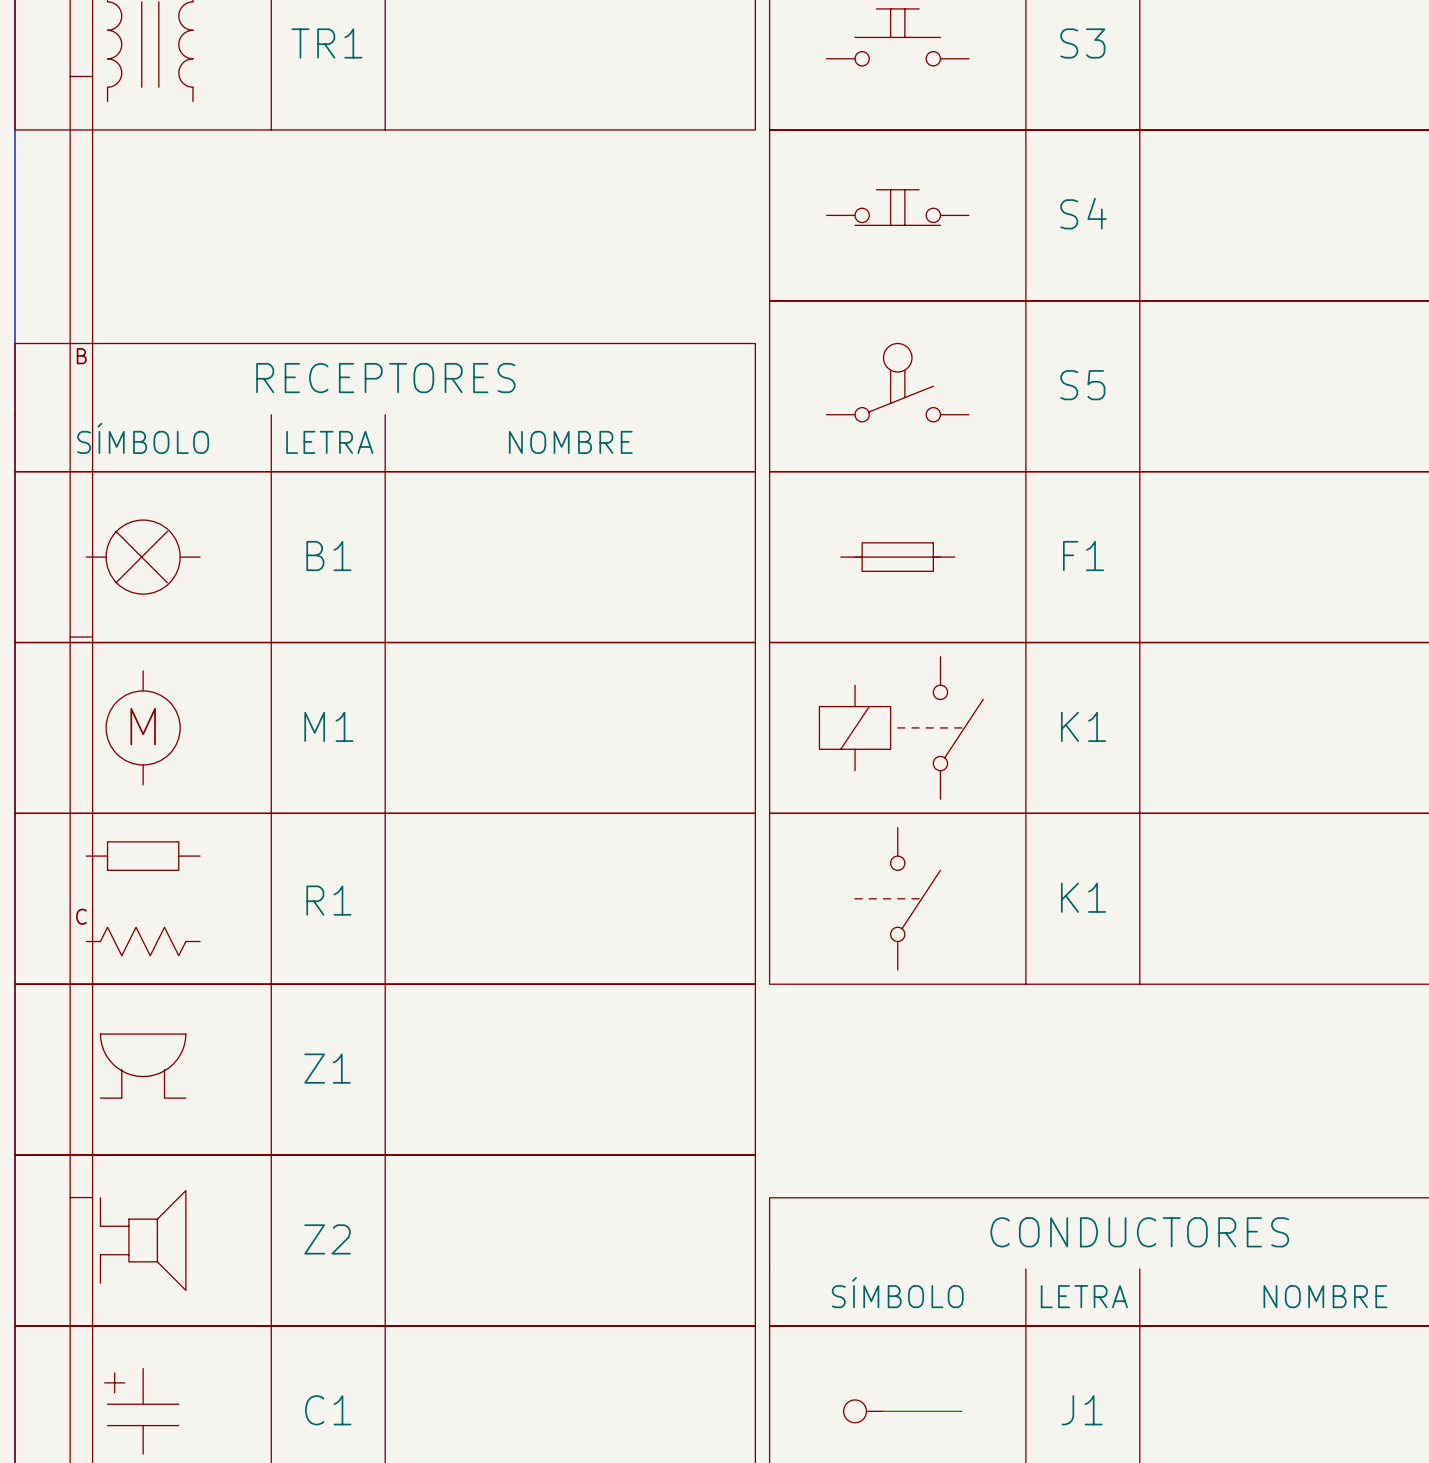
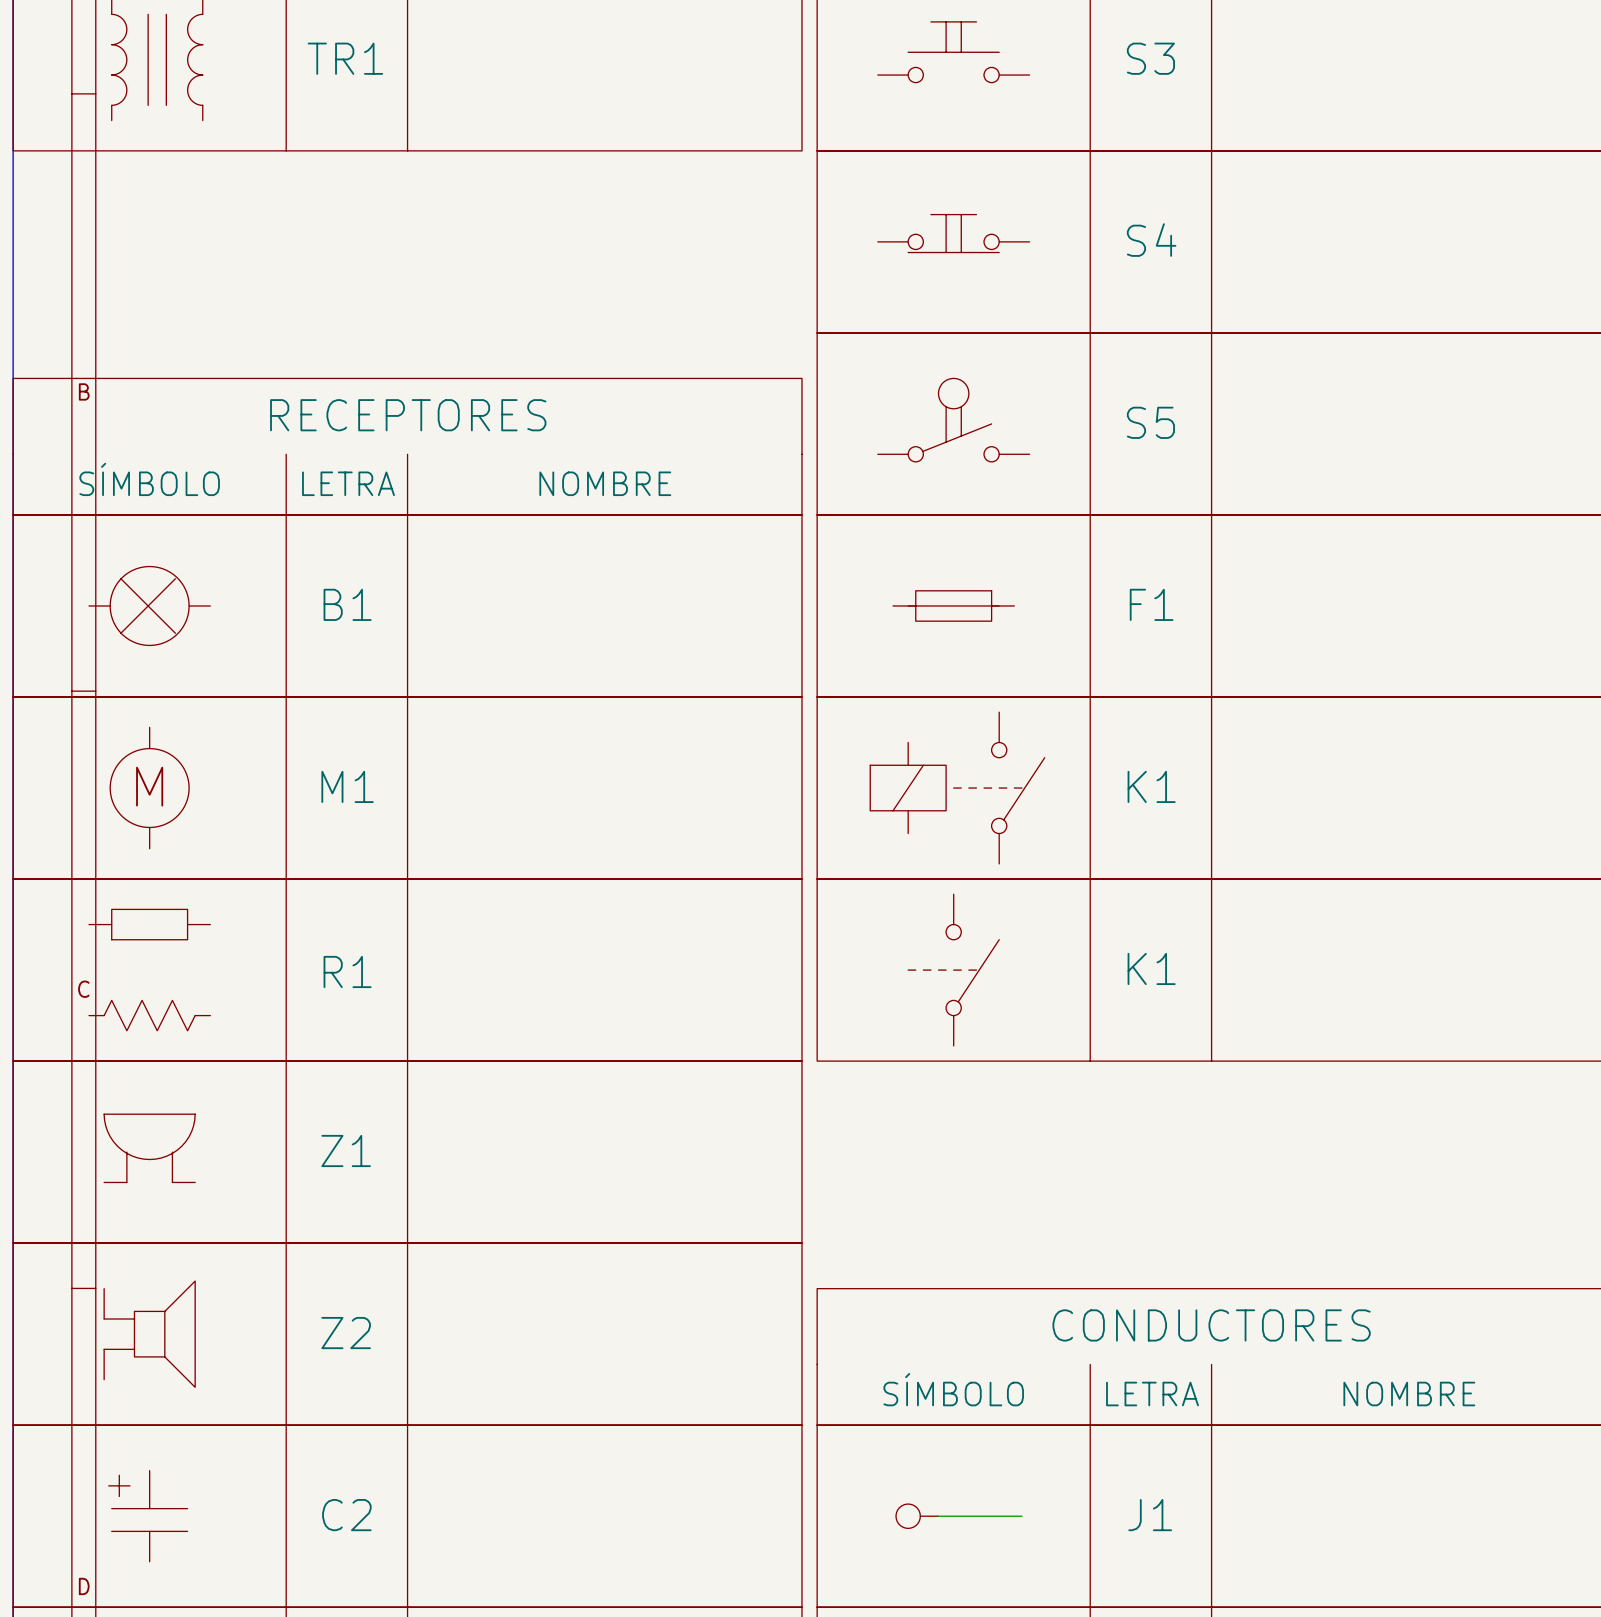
C1 name: C1 (328, 1410) -> C2 (346, 1515)

